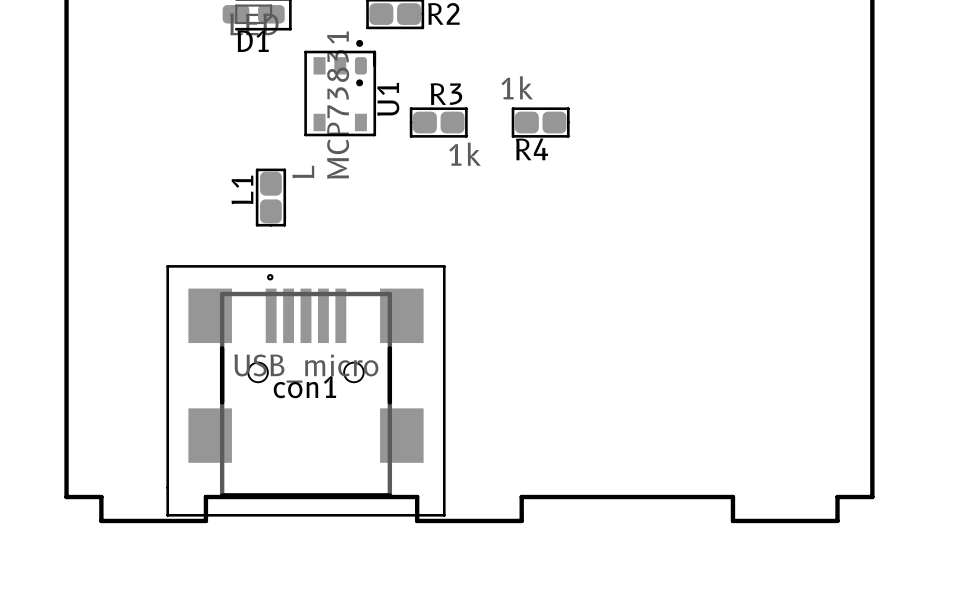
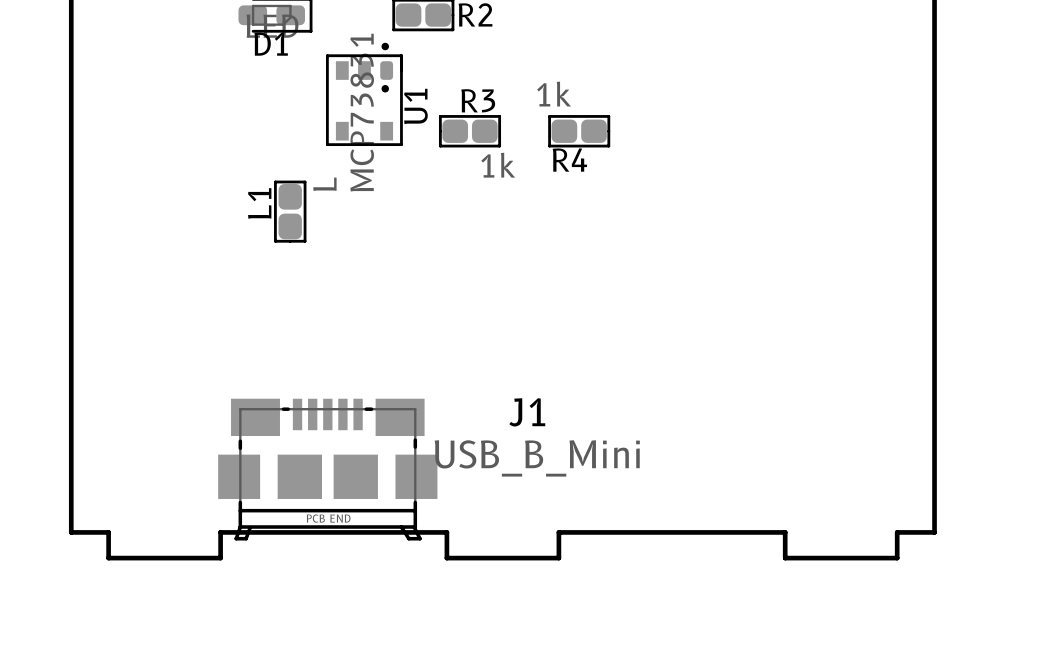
con1: USB_micro (305, 390) -> none
J1: none -> USB_B_Mini (327, 462)

